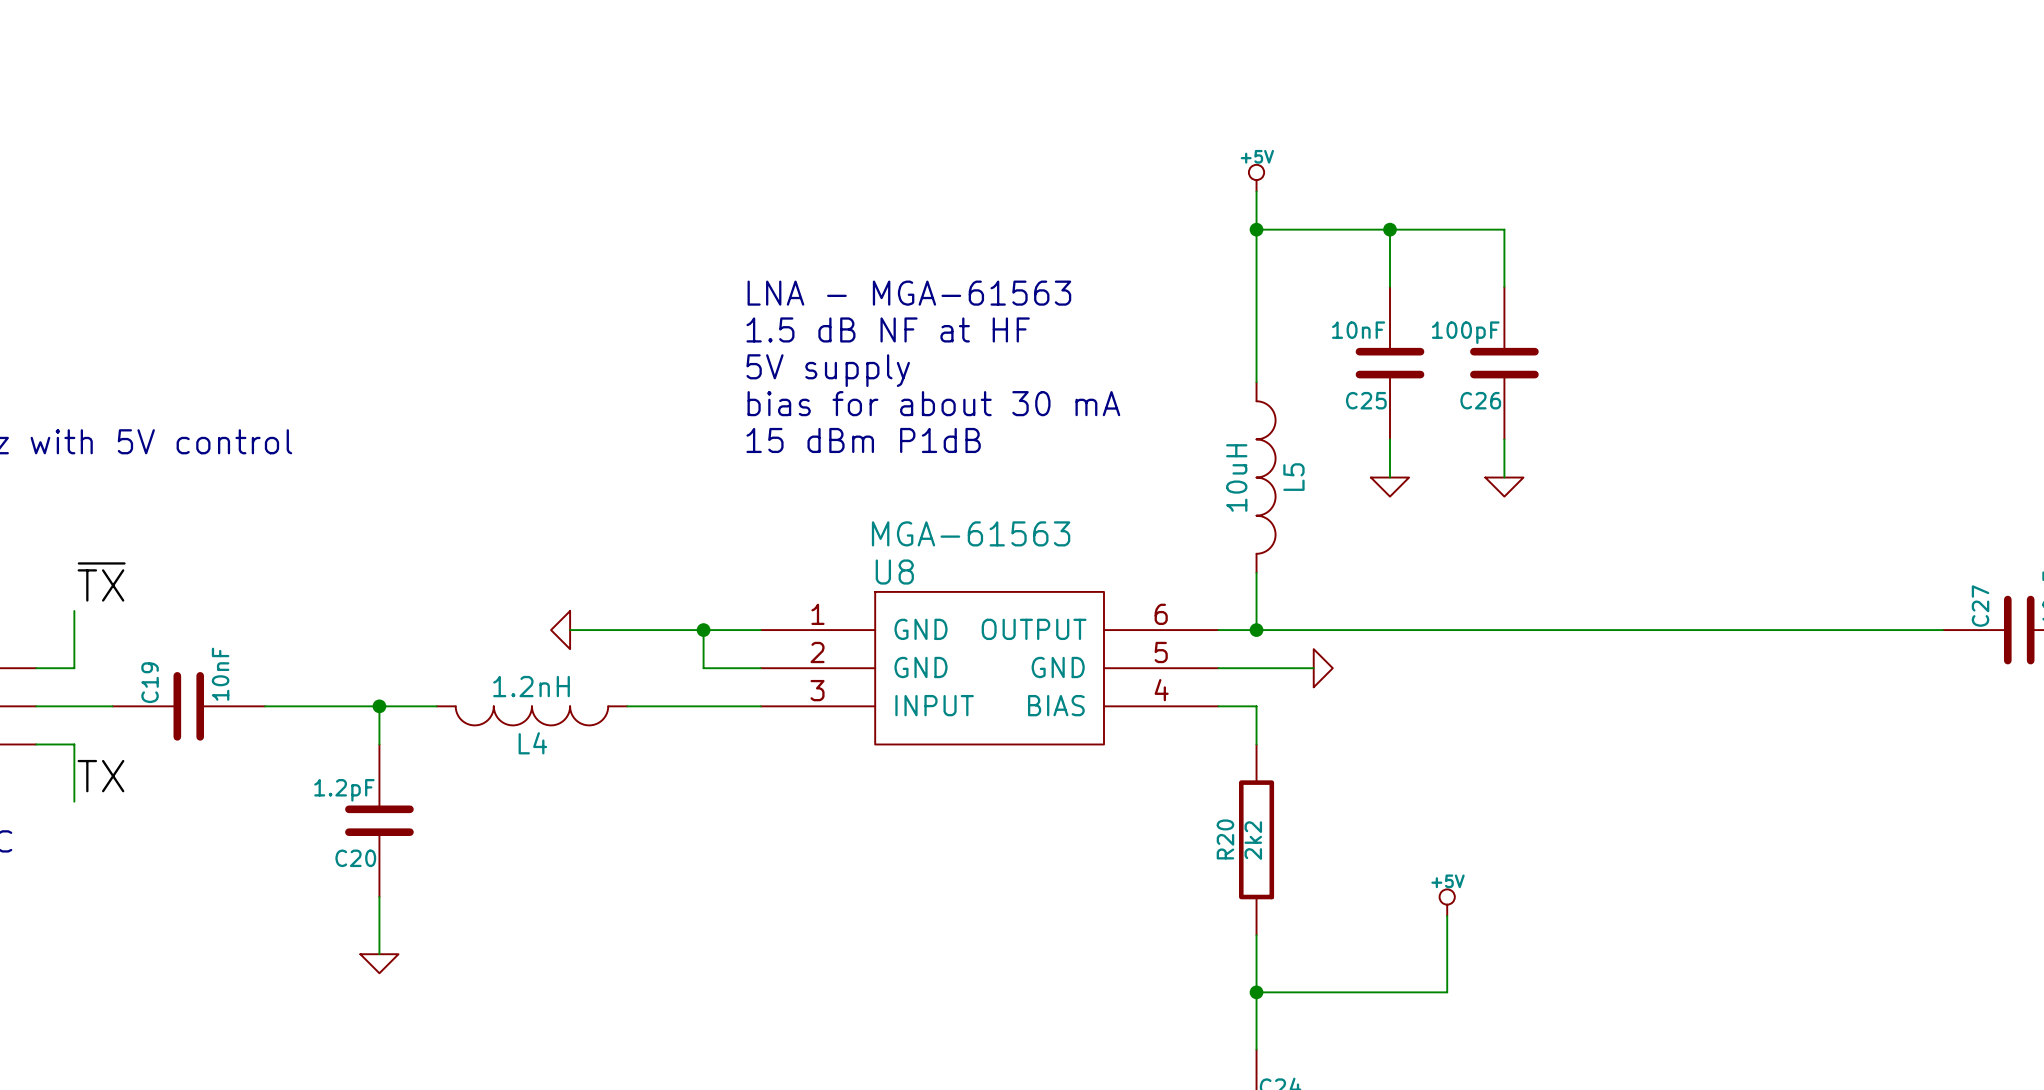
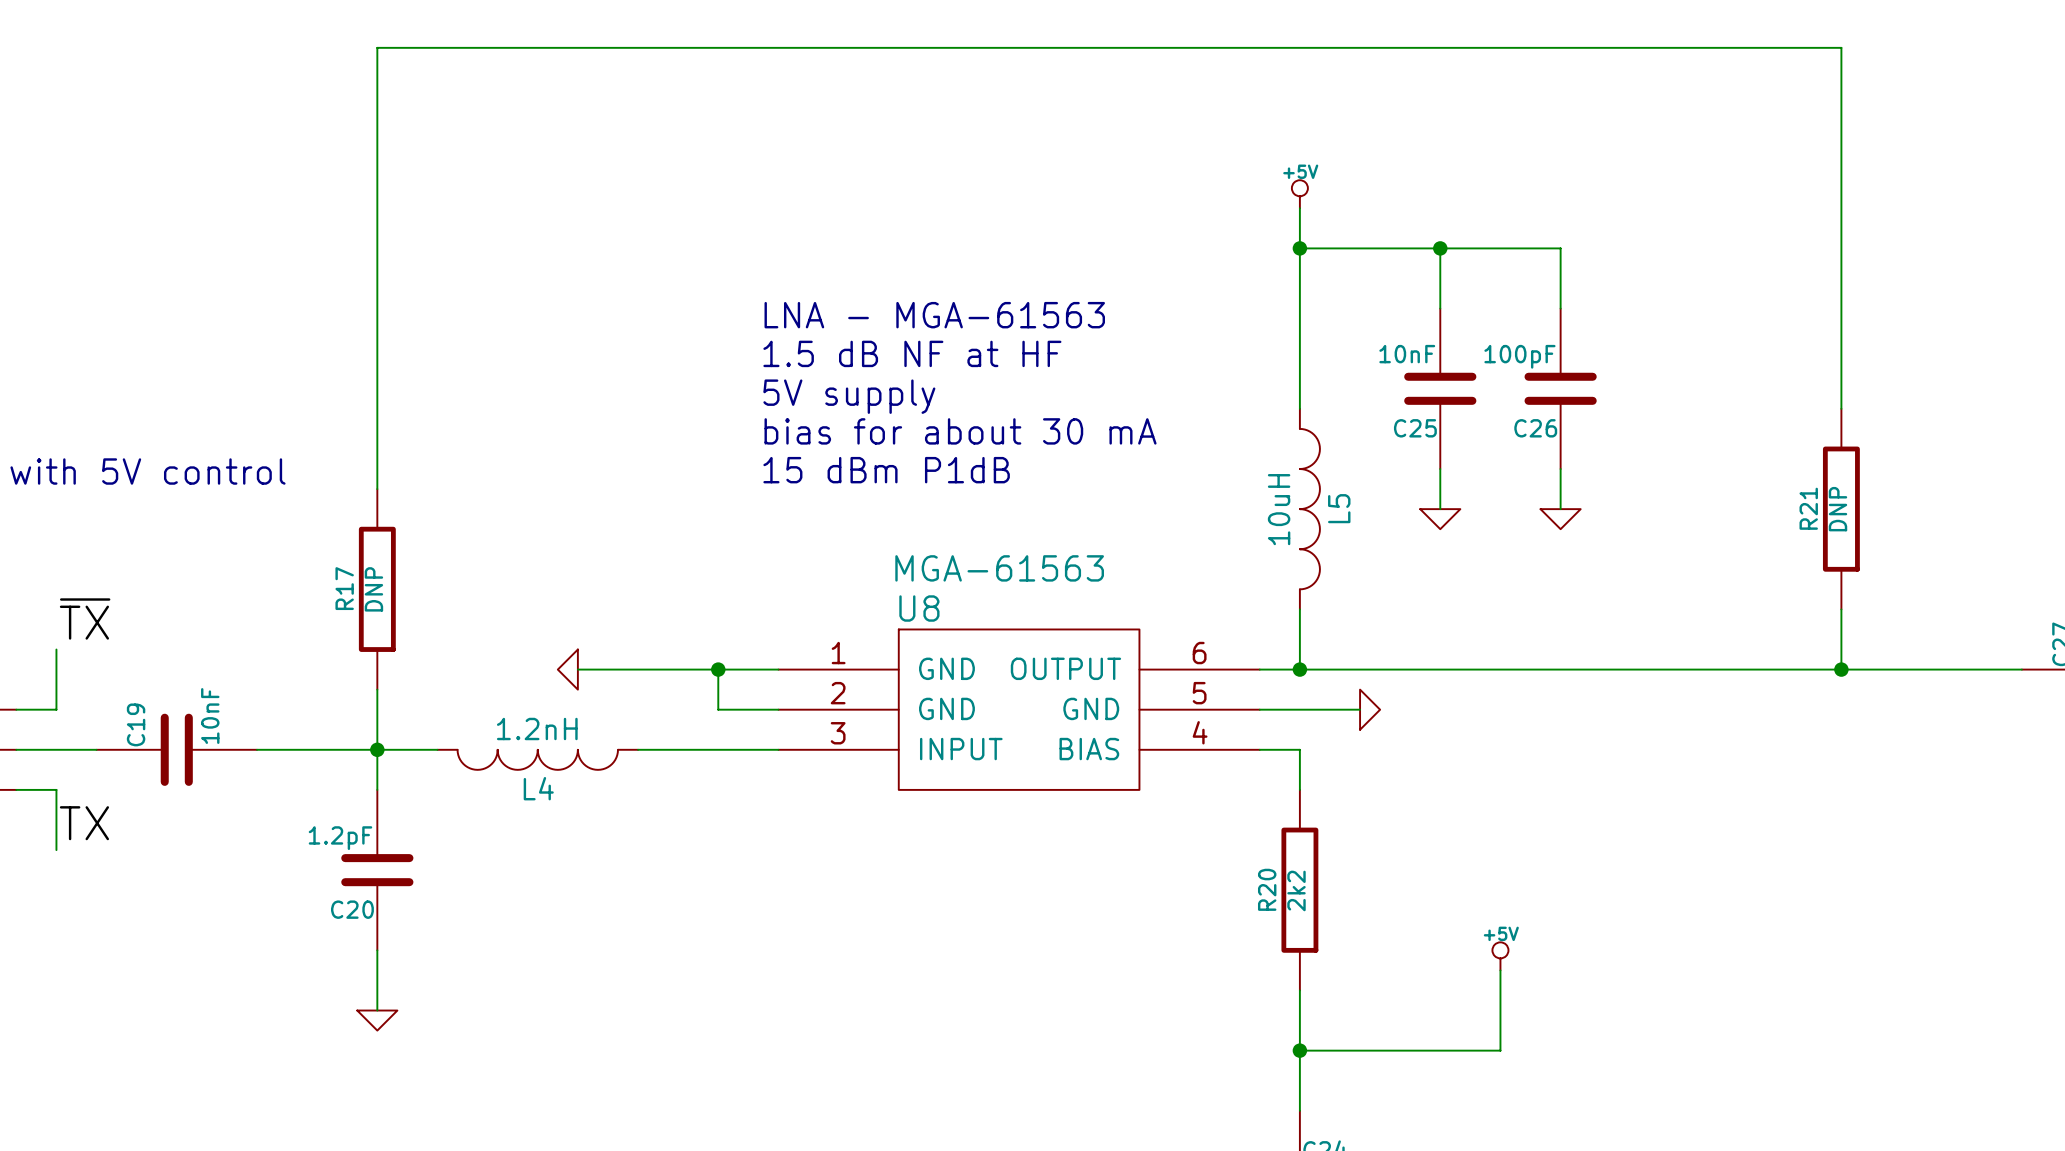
wire: none -> (1841, 408) (1841, 47) (377, 47) (377, 489)
R21: none -> DNP (1841, 509)
R17: none -> DNP (377, 589)
wire: none -> (1841, 609) (1841, 669)
junction: none -> (1841, 669)
wire: none -> (377, 689) (377, 749)

